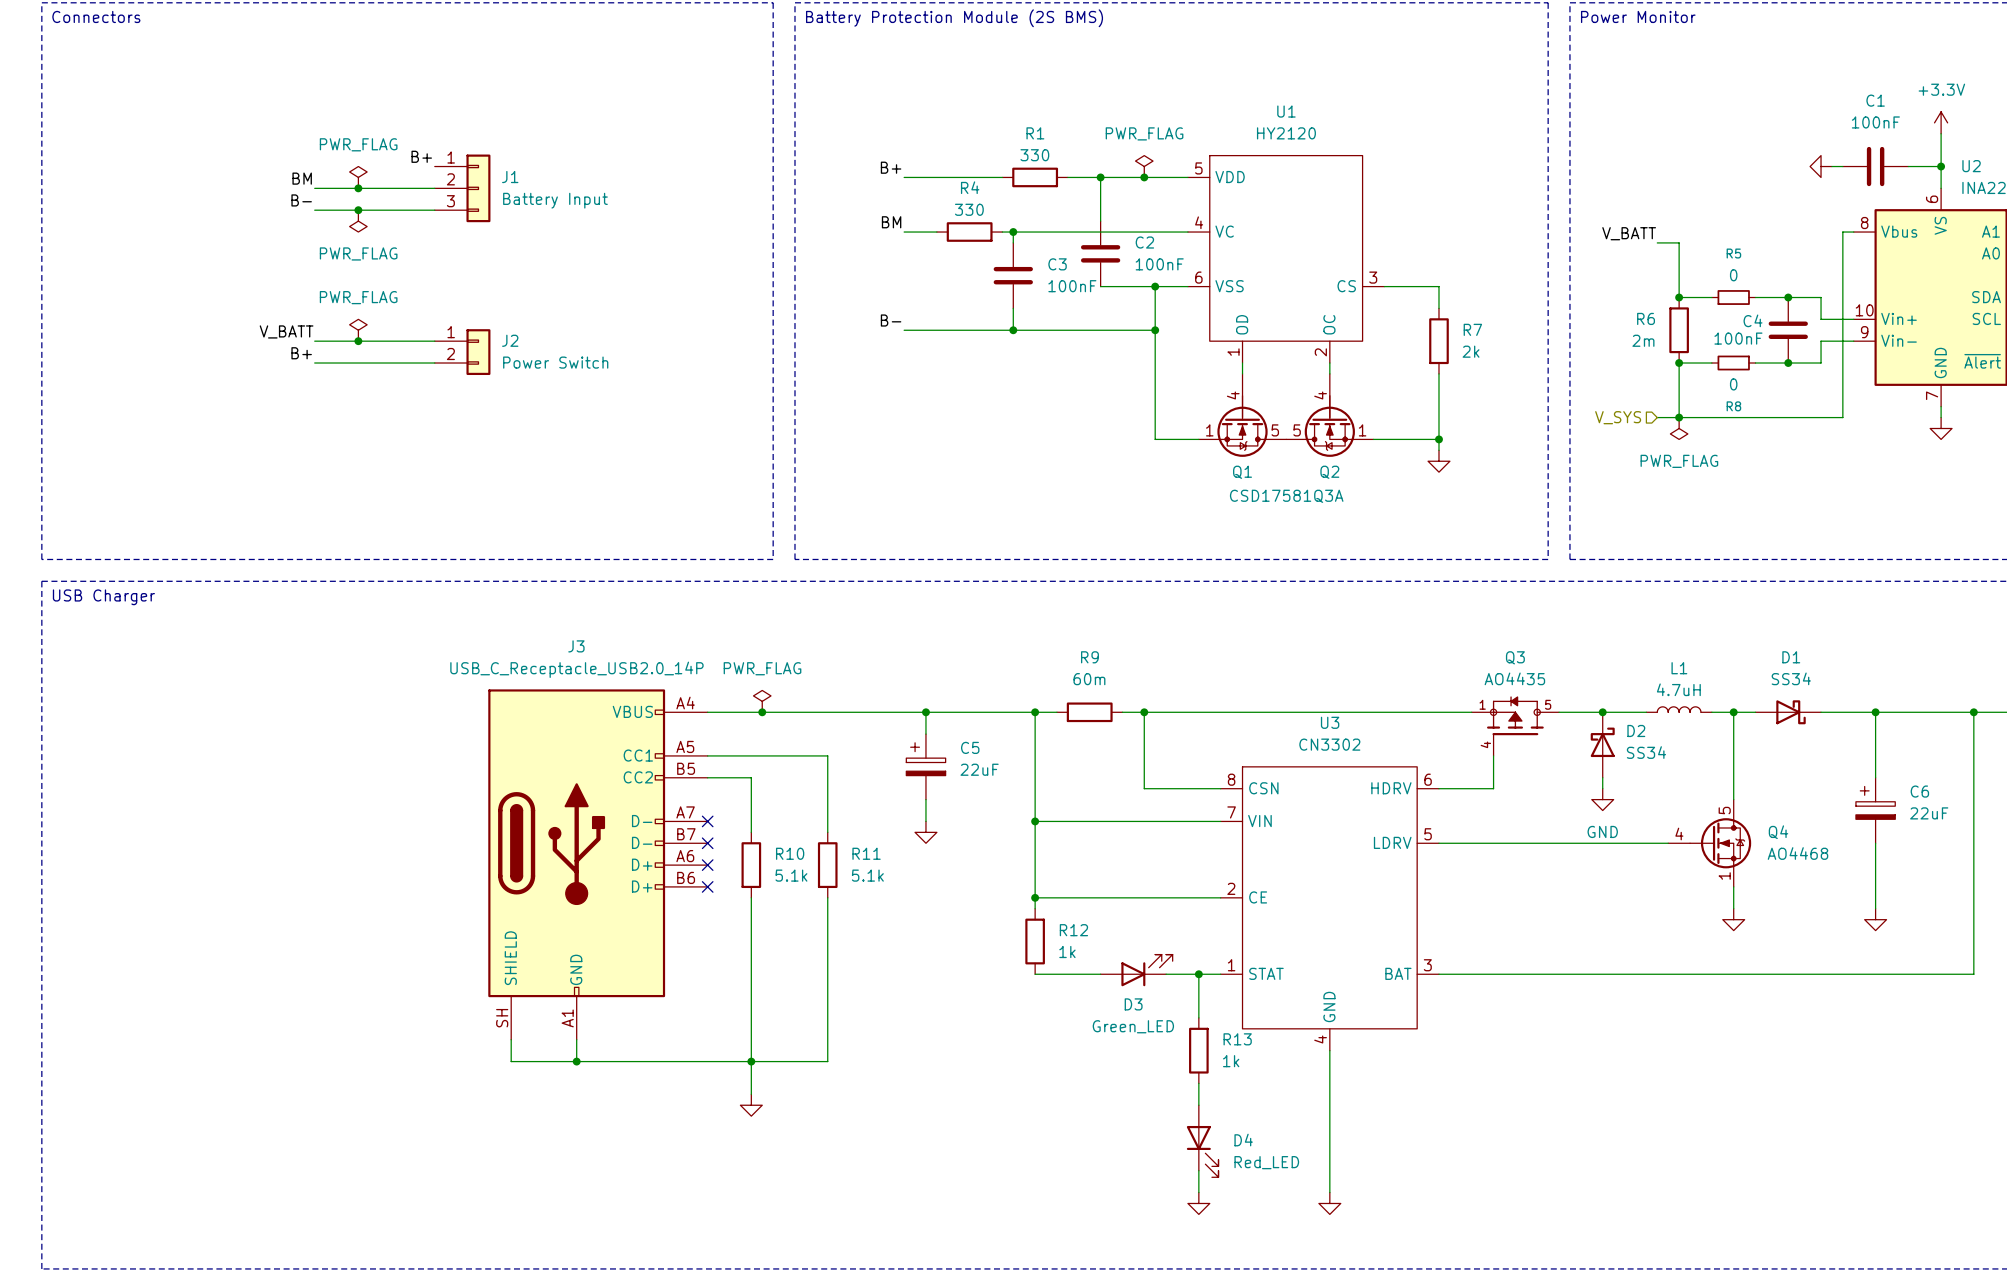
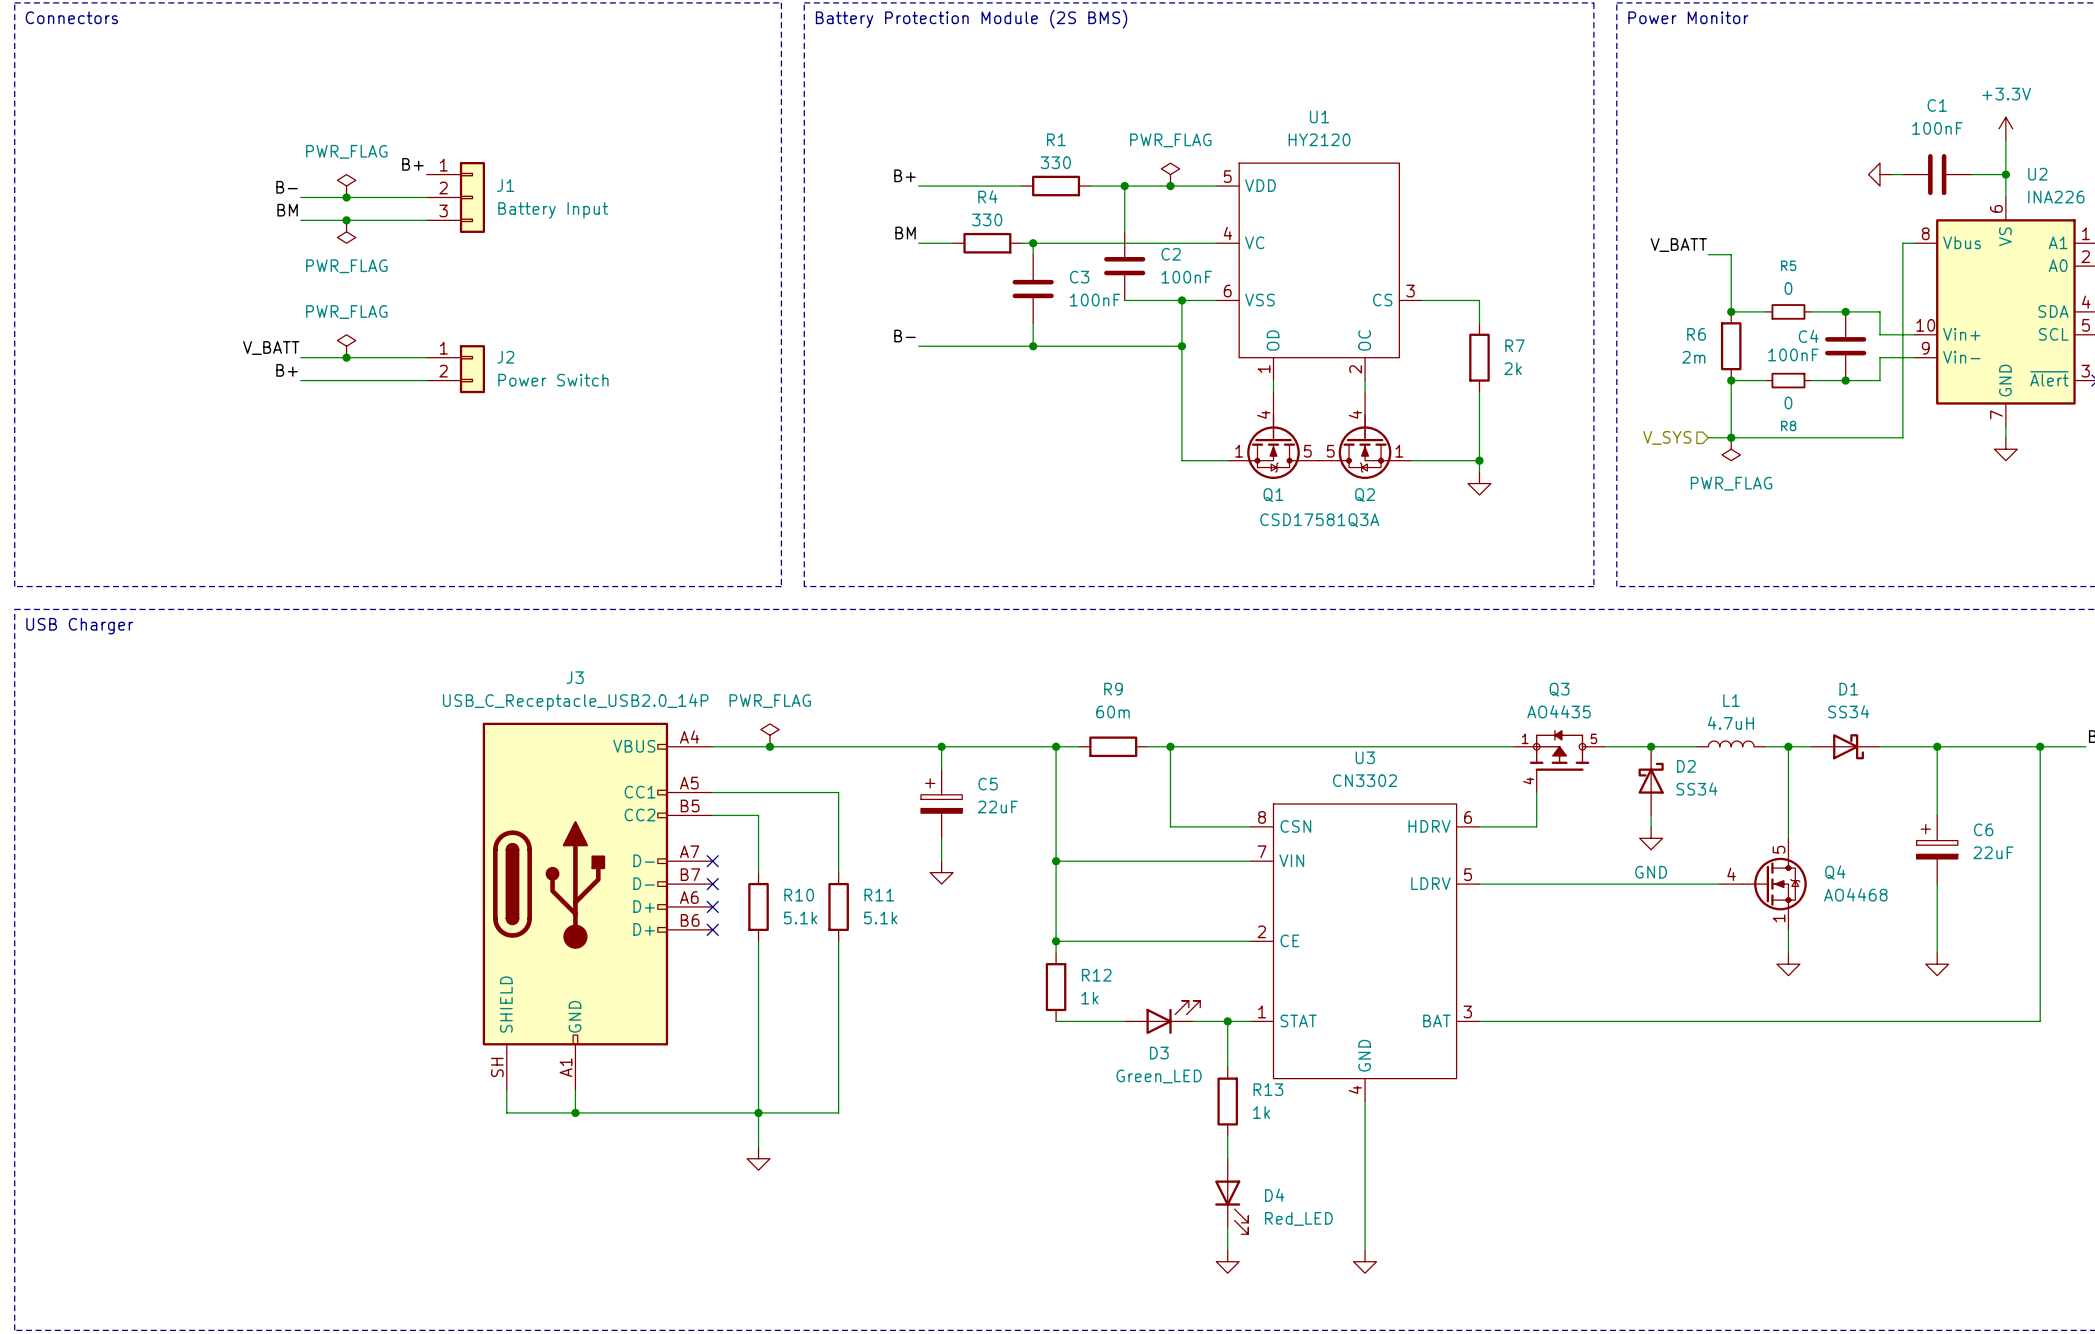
label: BM (302, 178) -> B- (287, 187)
label: B- (301, 200) -> BM (287, 210)

